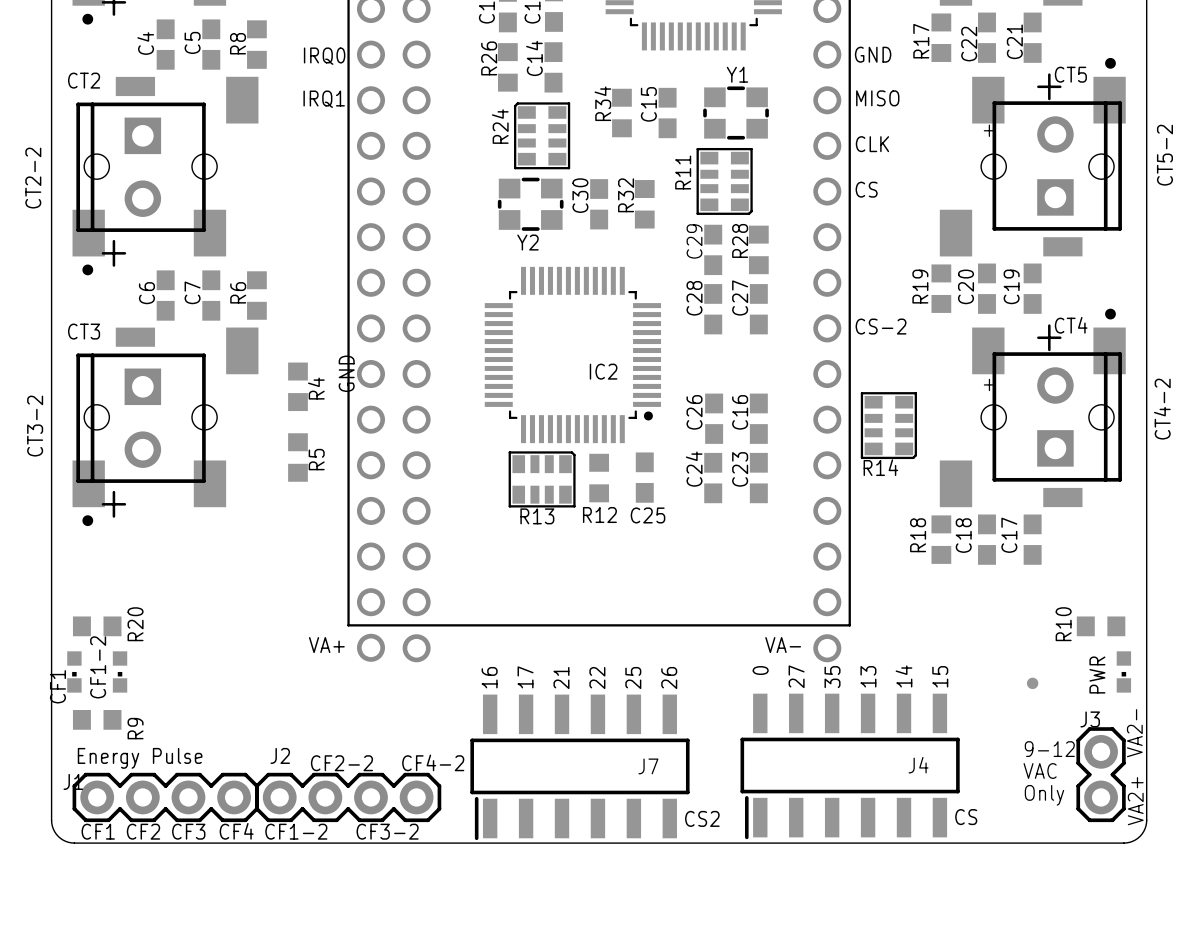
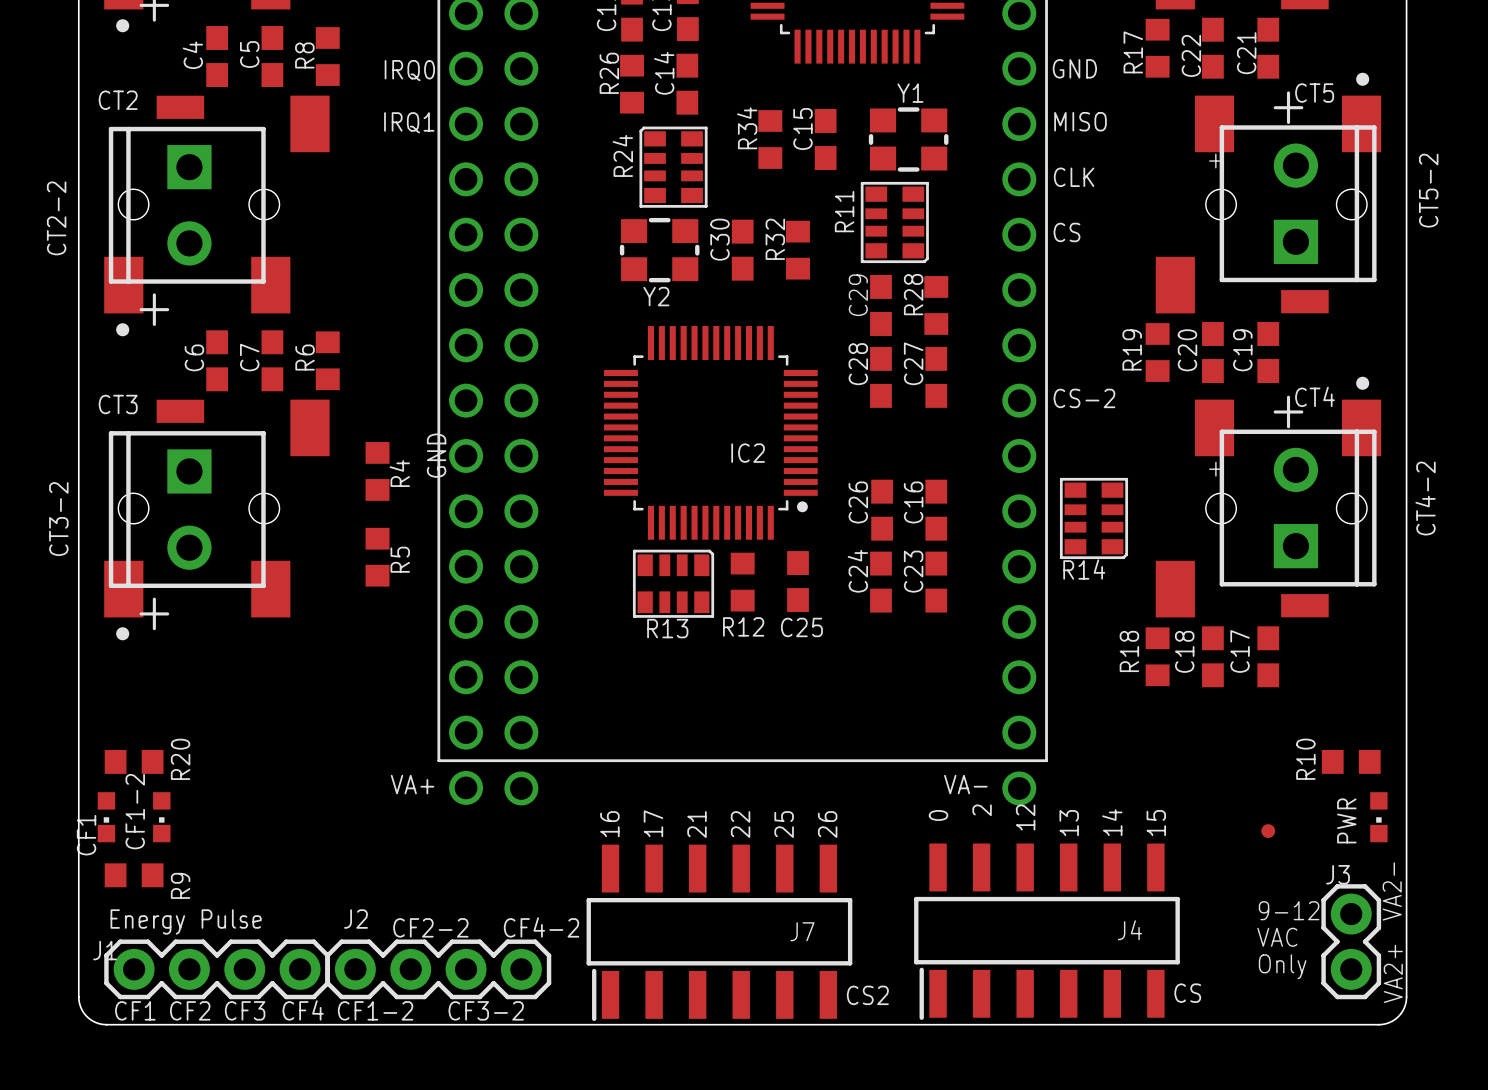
text: 27 (796, 676) -> 2 (982, 810)
text: 35 (832, 677) -> 12 (1025, 817)

